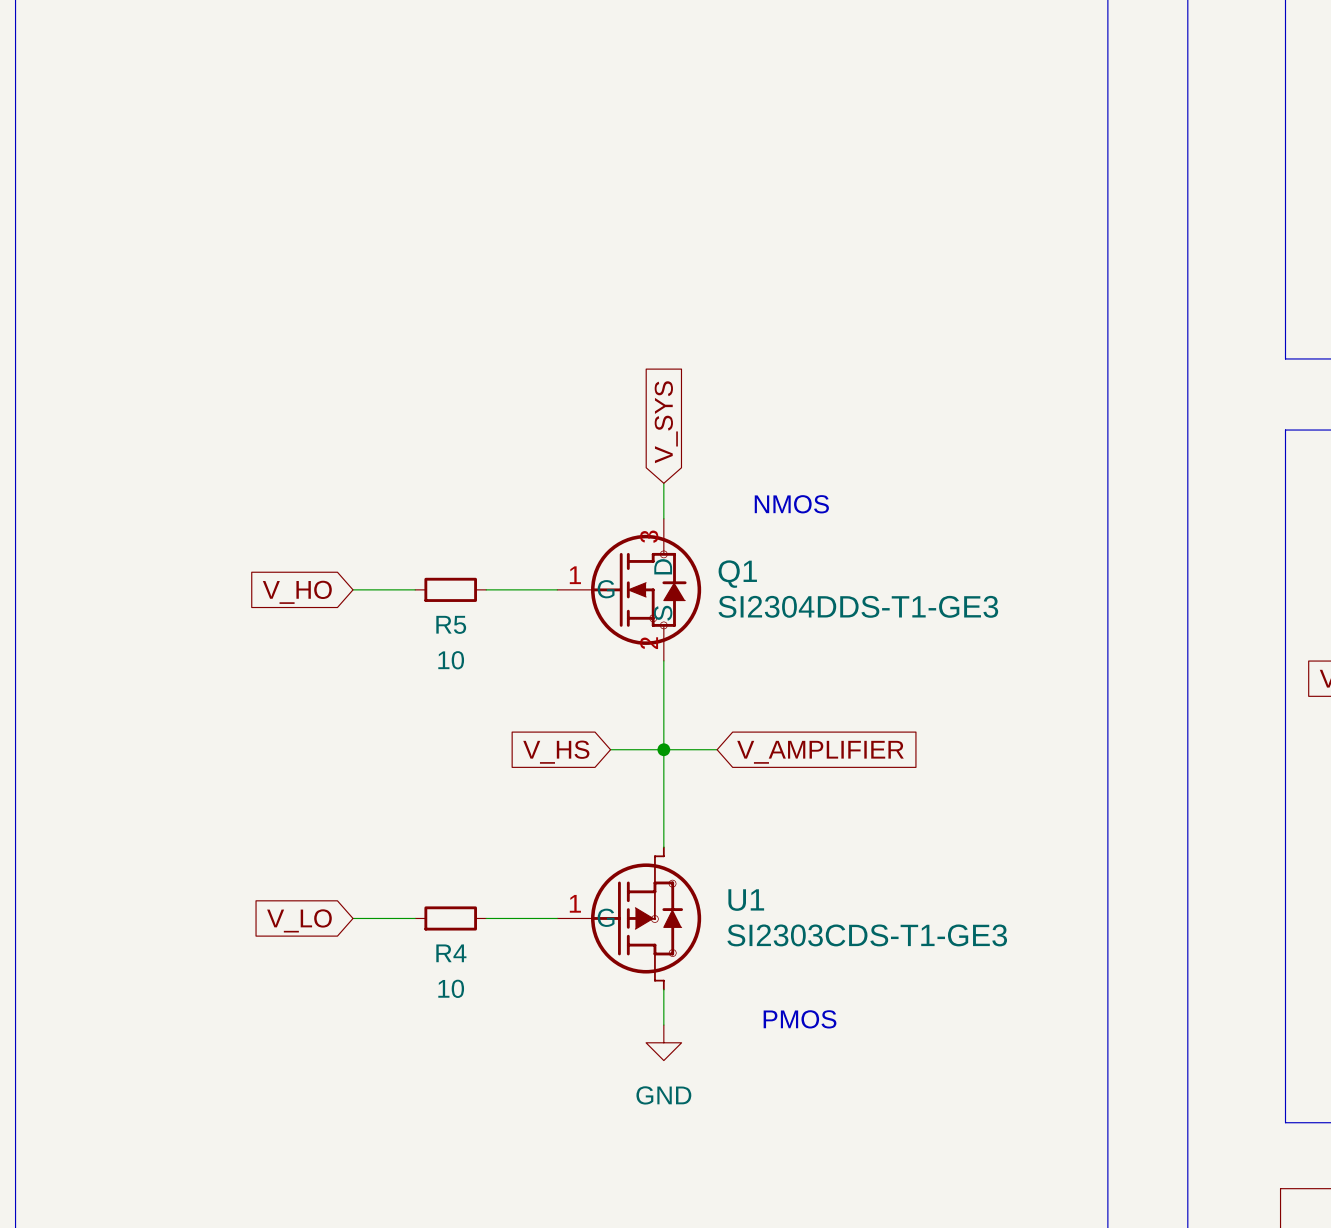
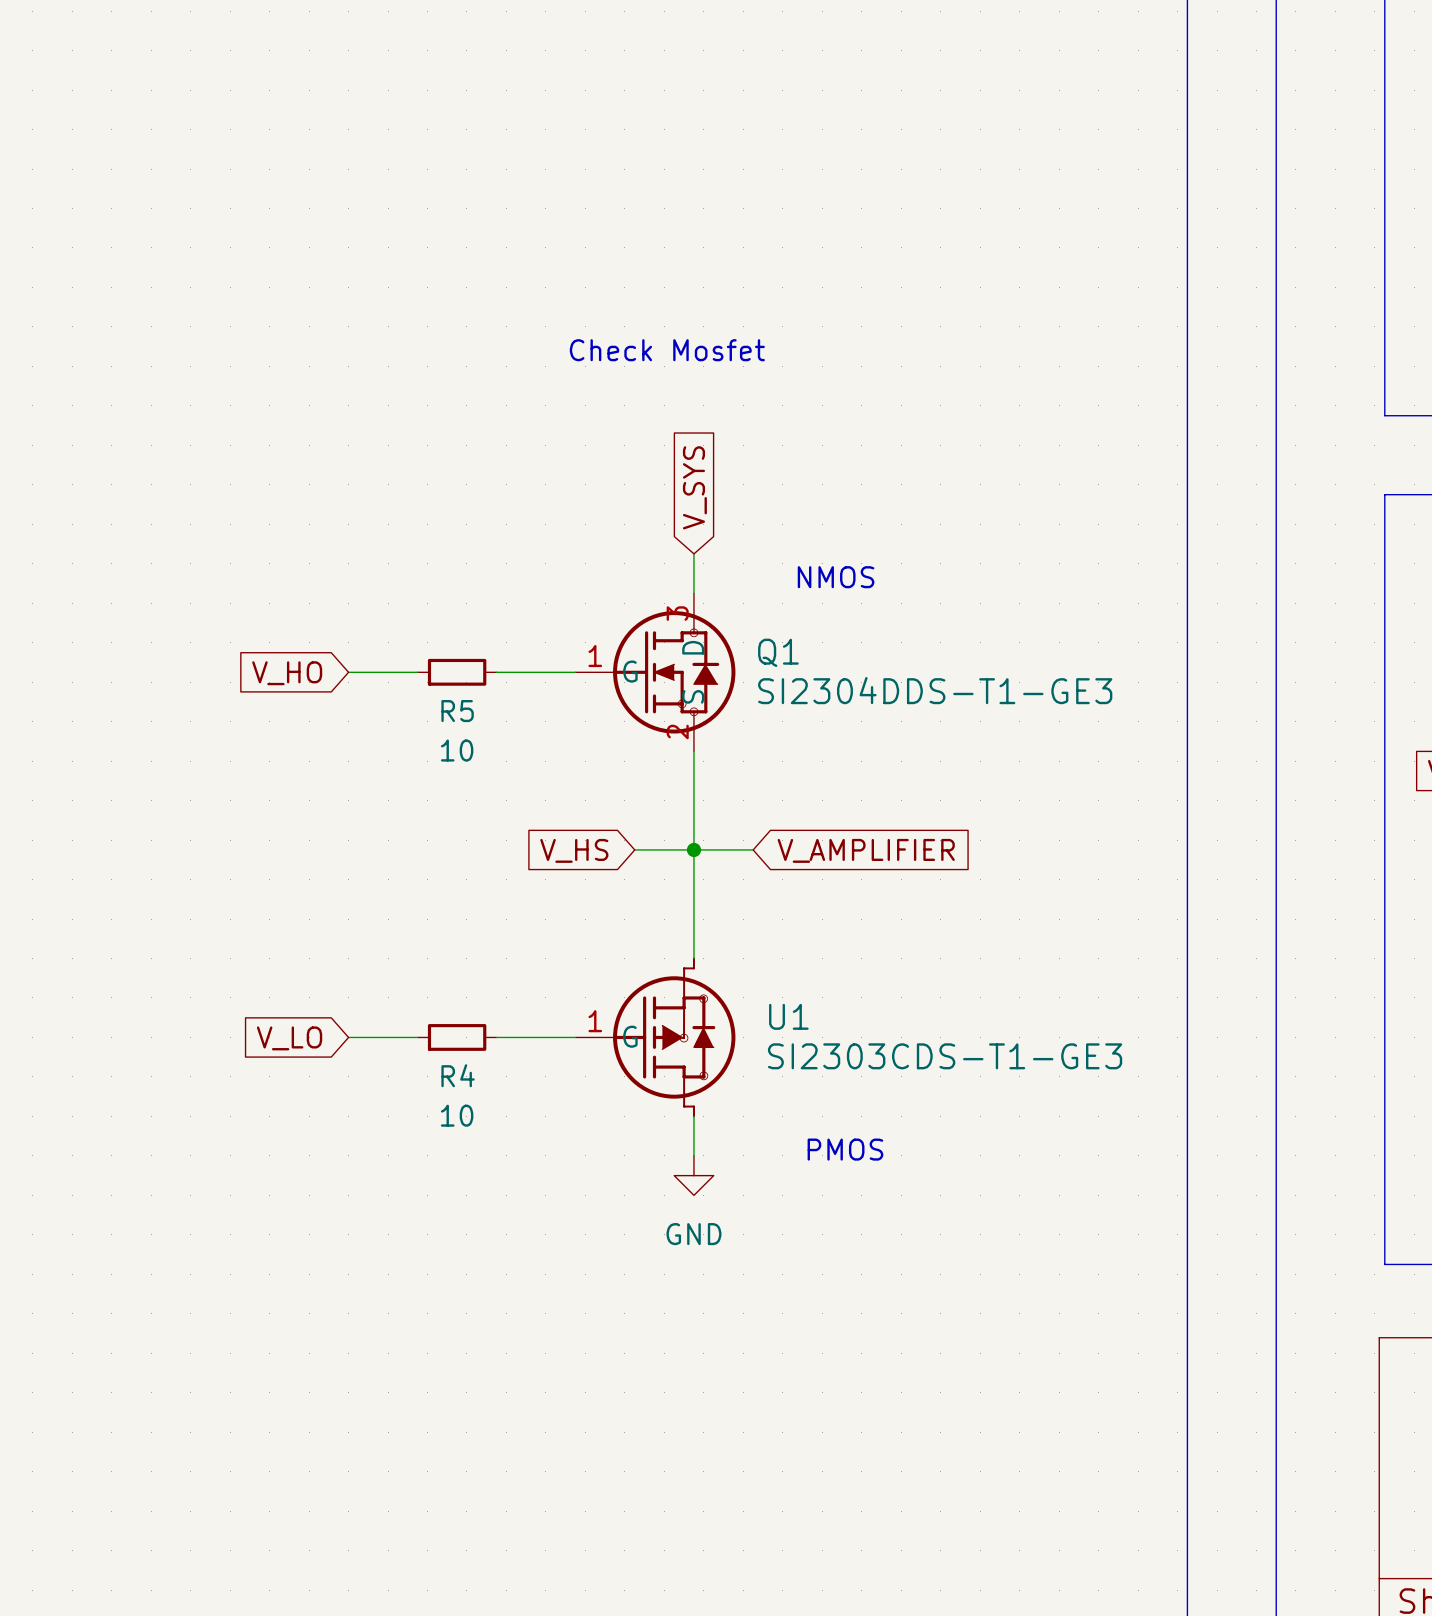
text: none -> Check Mosfet (667, 350)

